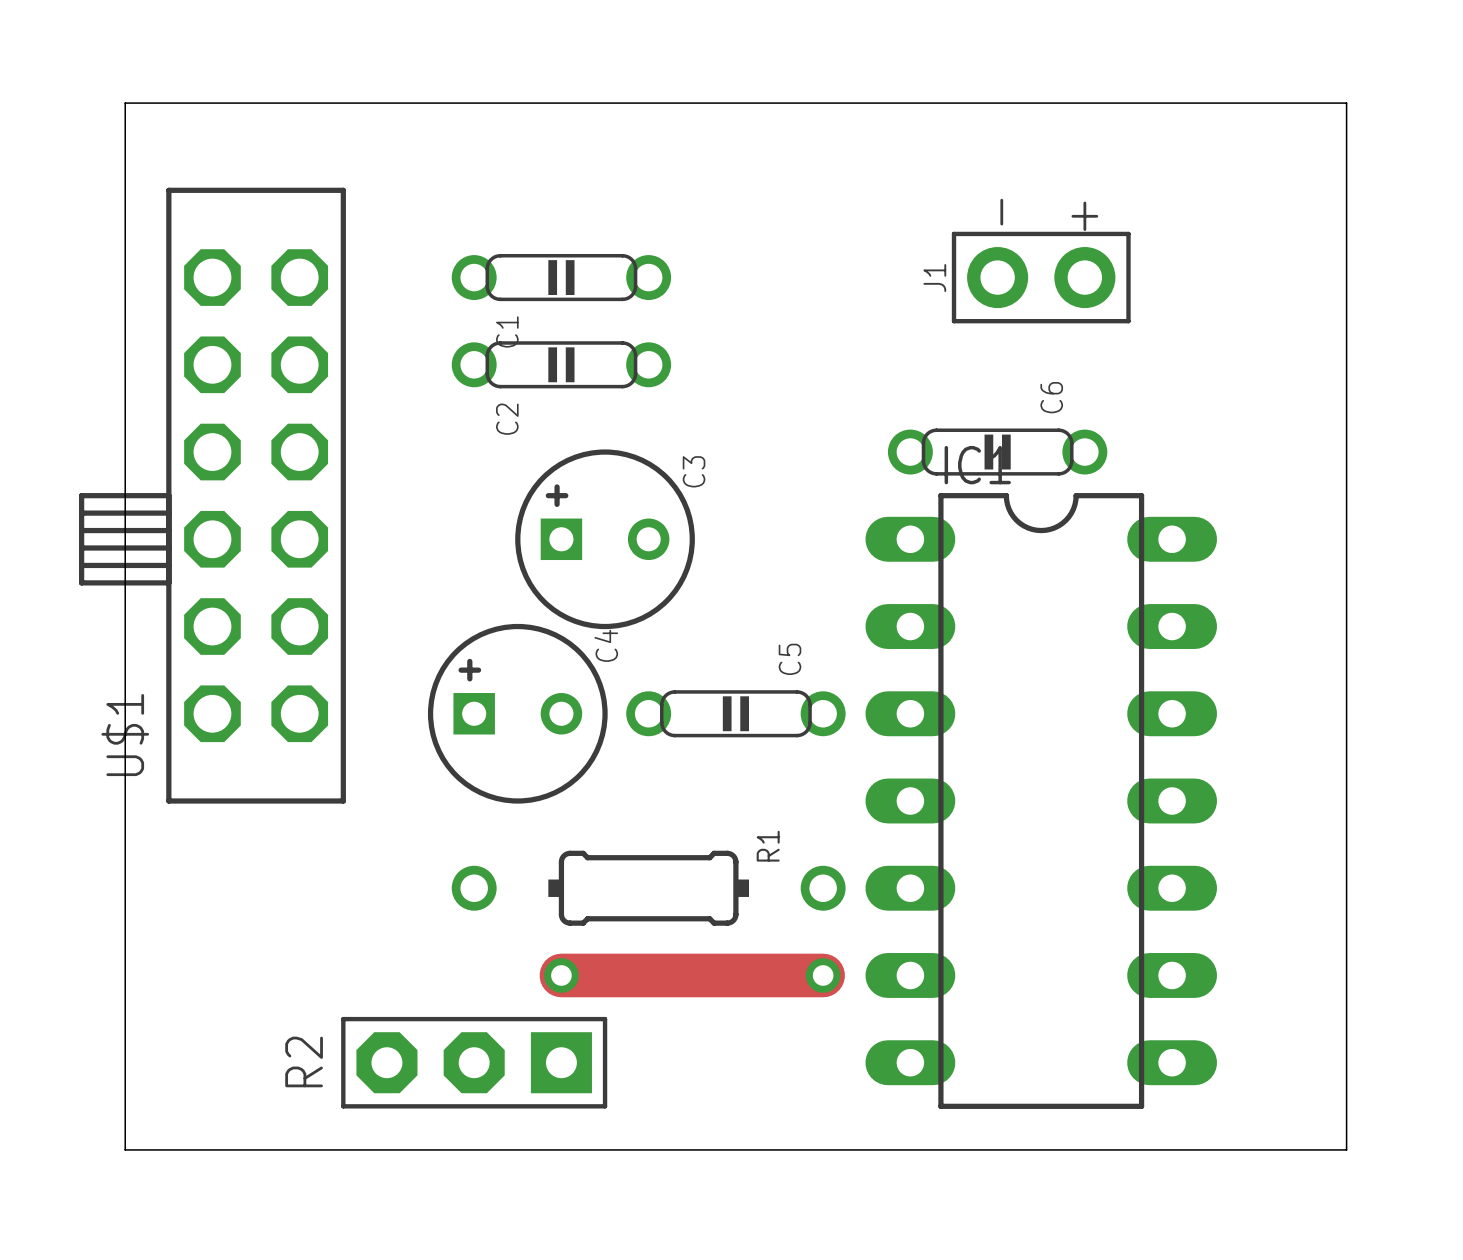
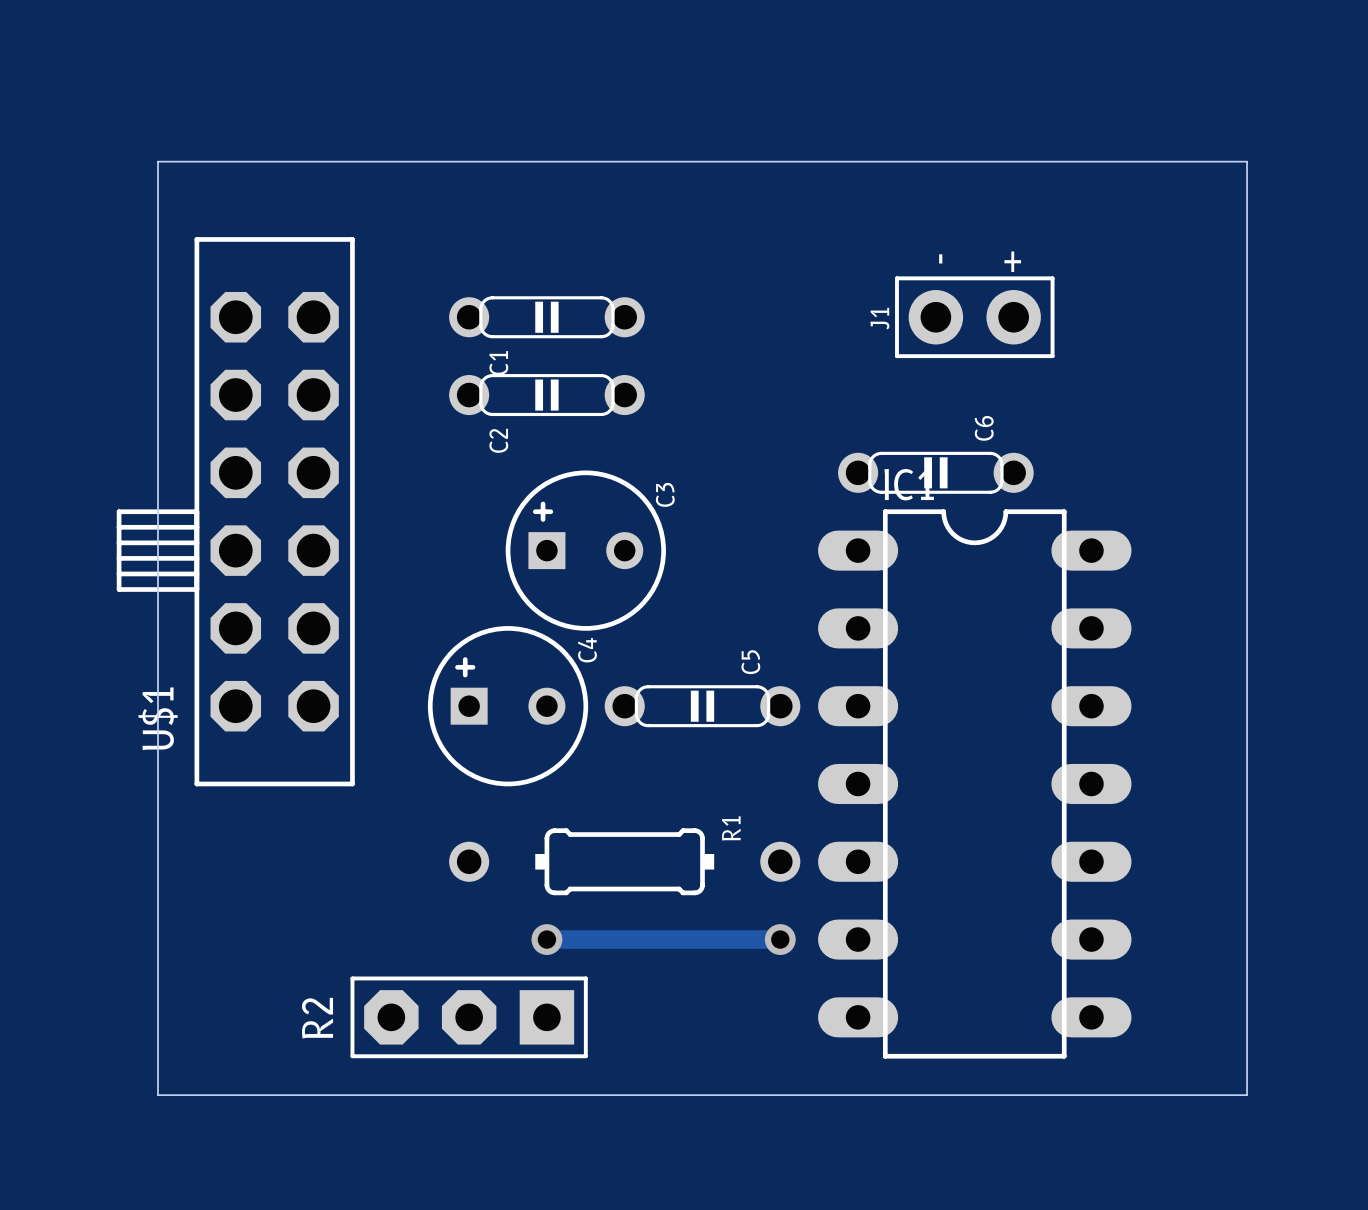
track width: thick (561, 975) (823, 975) -> thin (546, 939) (780, 939)

